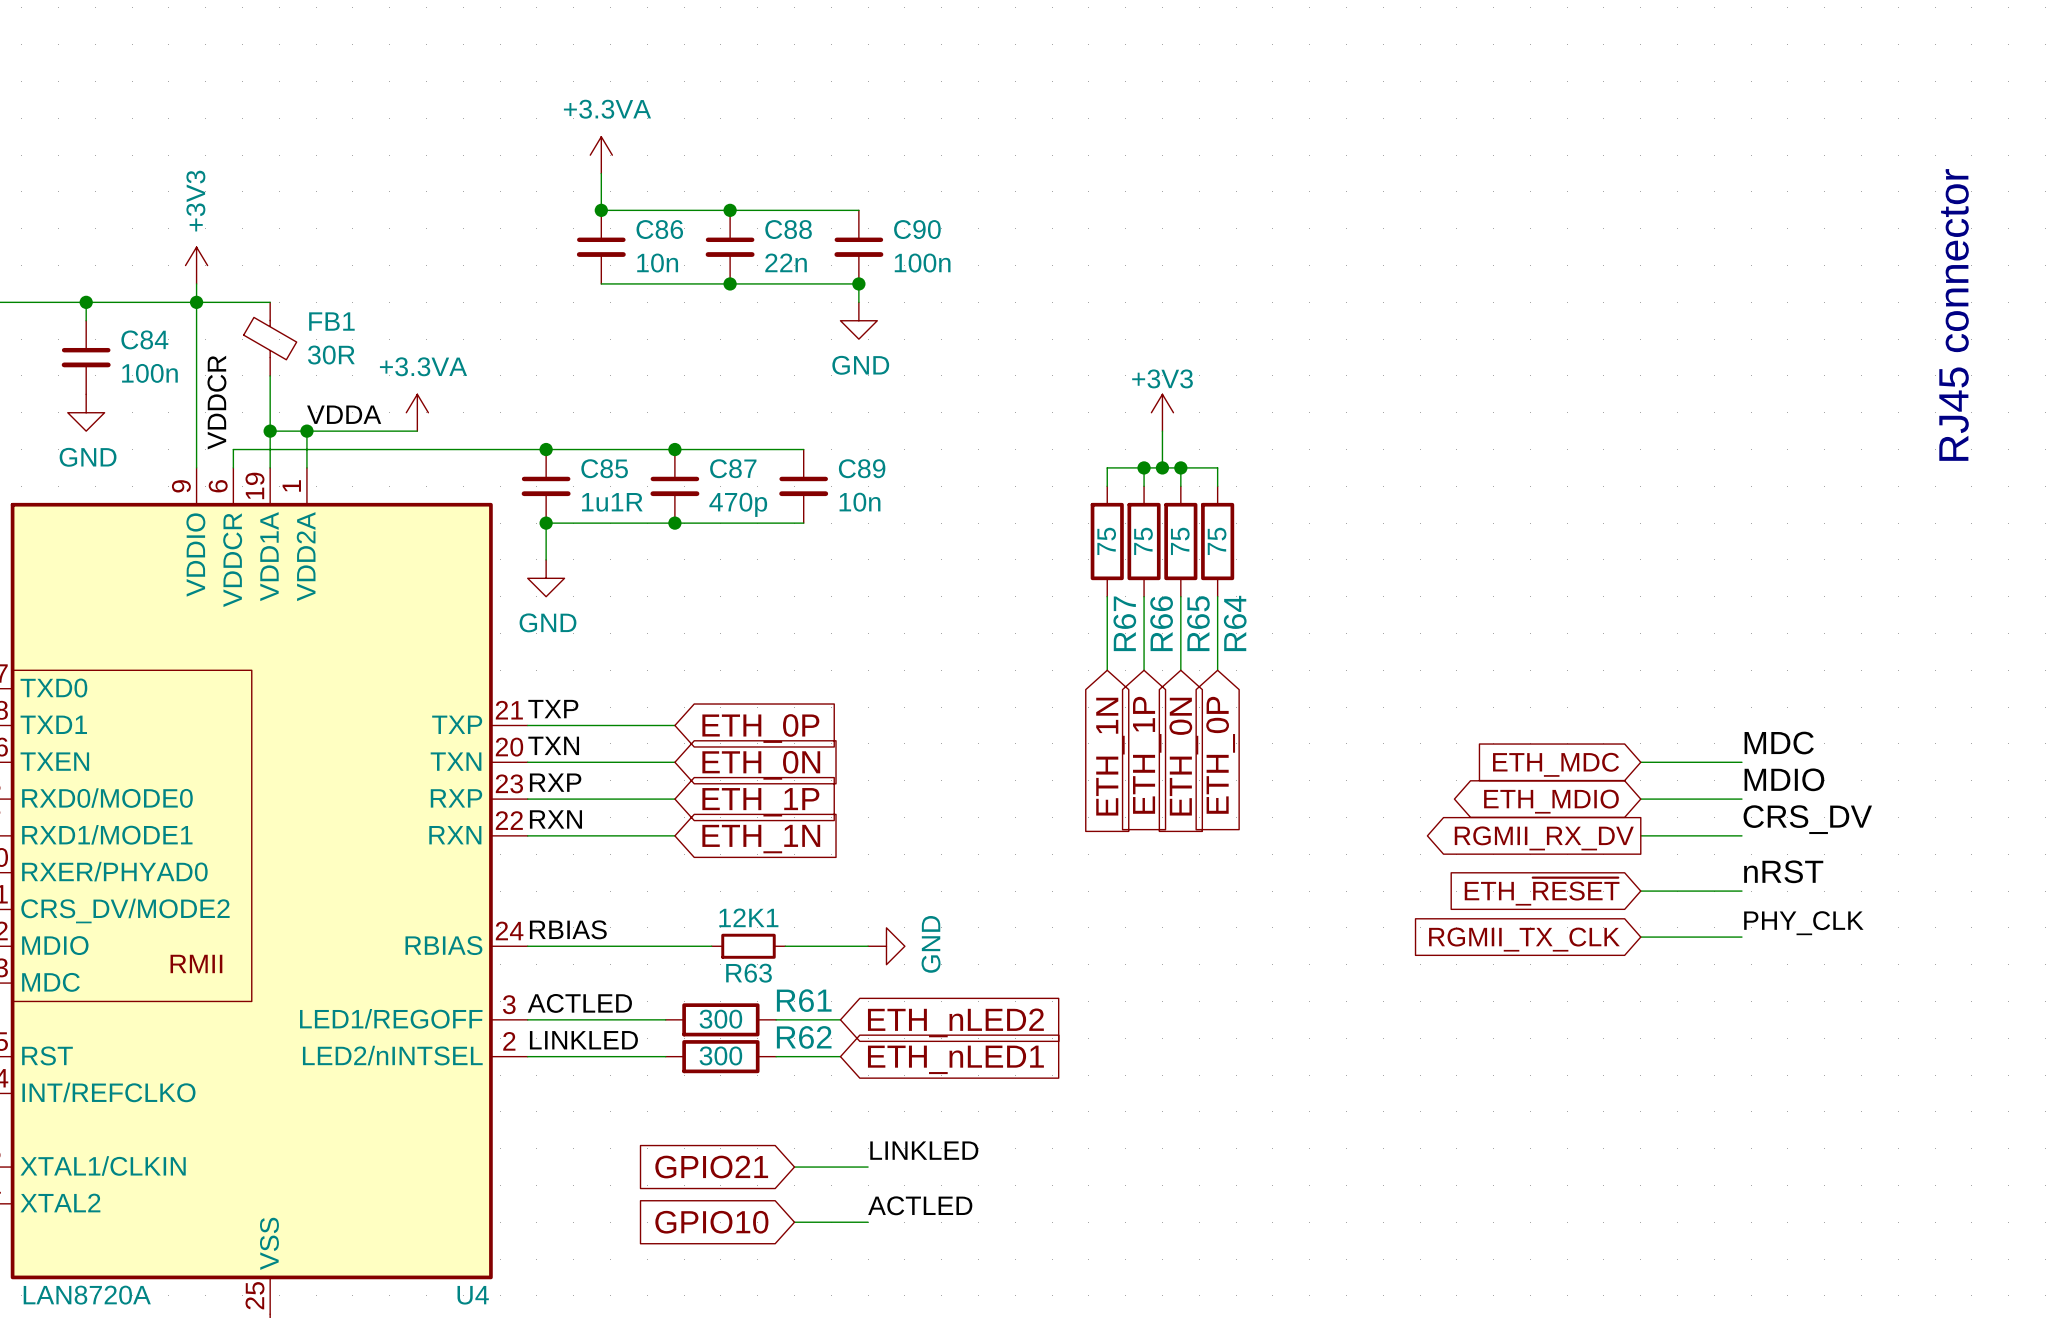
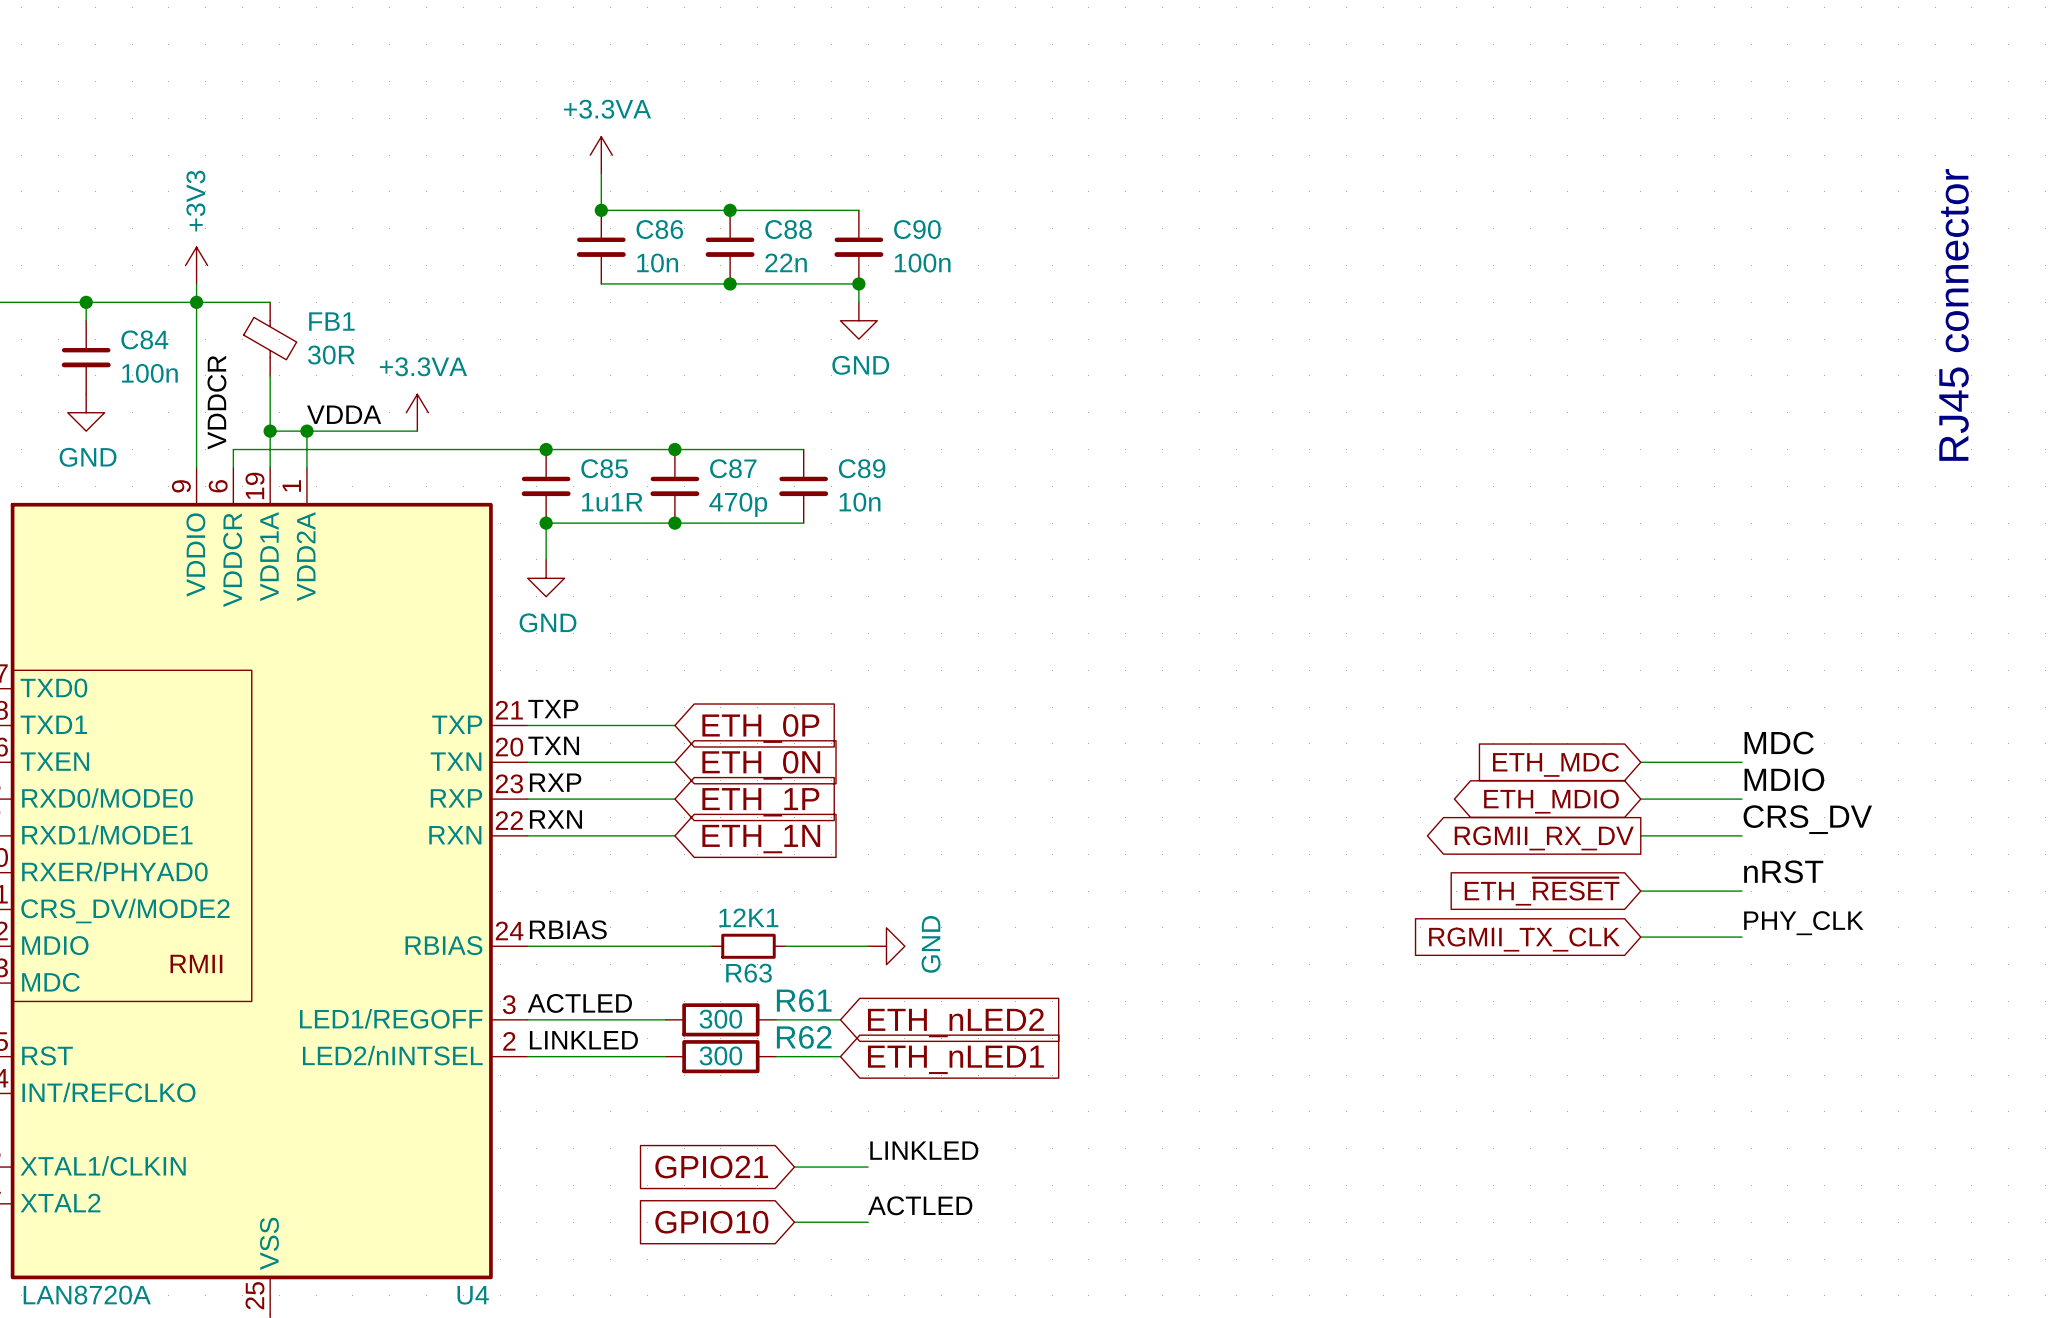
power symbol: +3V3 (1162, 412) -> none
wire: (1162, 431) (1162, 467) -> none
wire: (1144, 467) (1144, 486) -> none
junction: (1144, 467) -> none
junction: (1162, 467) -> none
wire: (1180, 467) (1180, 486) -> none
junction: (1180, 467) -> none
wire: (1107, 486) (1107, 467) (1217, 467) (1217, 486) -> none
R67: (1107, 541) -> none
R66: (1144, 541) -> none
R65: (1180, 541) -> none
R64: (1217, 541) -> none
wire: (1107, 596) (1107, 670) -> none
wire: (1144, 596) (1144, 670) -> none
wire: (1180, 596) (1180, 670) -> none
wire: (1217, 596) (1217, 670) -> none
global label: ETH_1P (1147, 755) -> none
global label: ETH_0P (1220, 755) -> none
global label: ETH_1N (1110, 756) -> none
global label: ETH_0N (1183, 756) -> none

